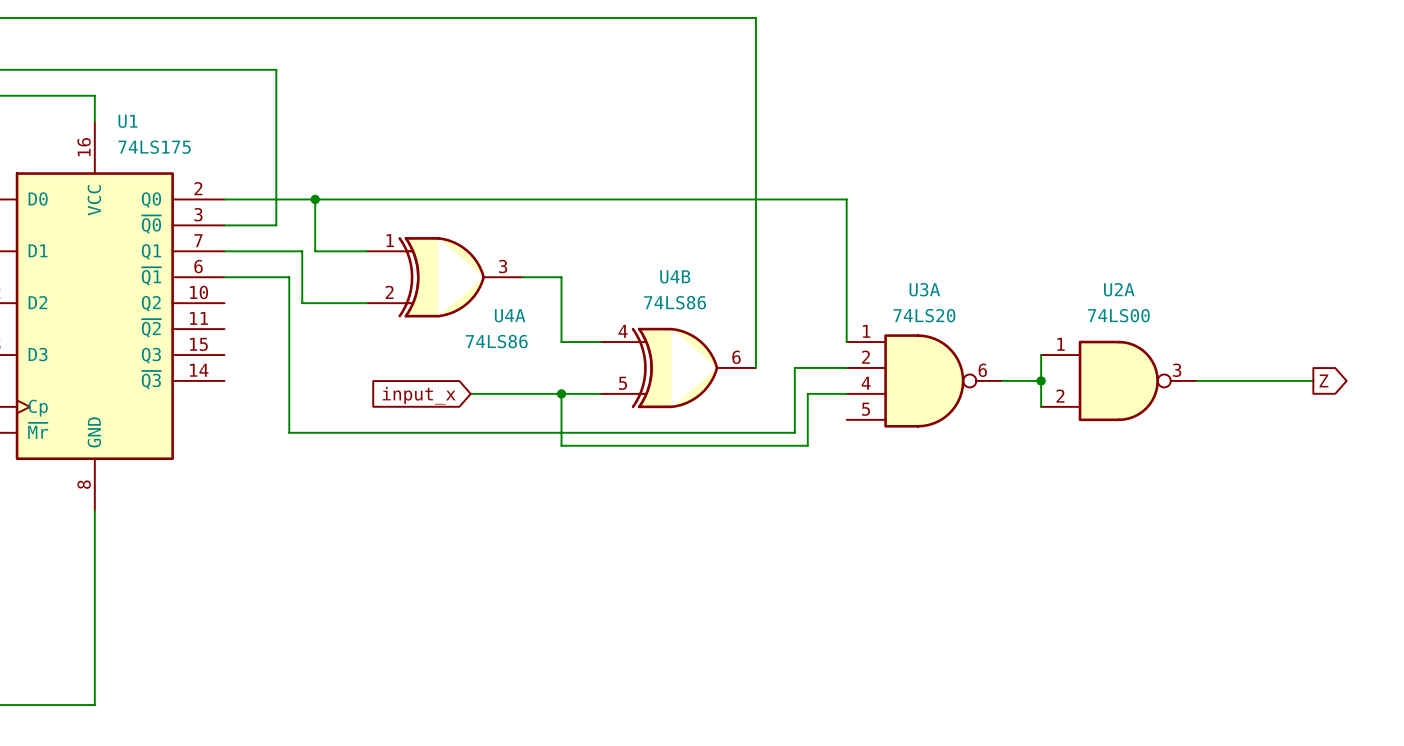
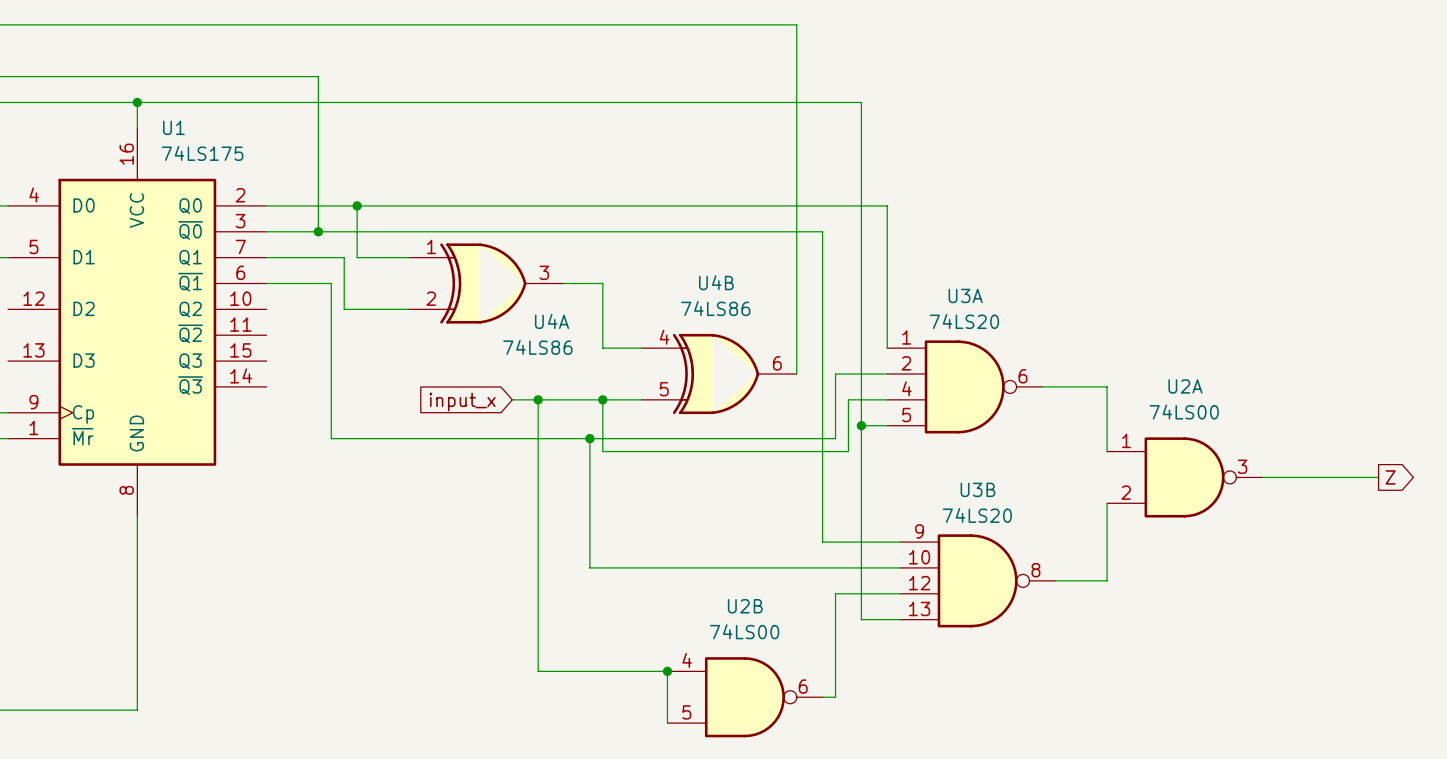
wire: none -> (137, 102) (861, 102) (861, 619) (900, 619)
junction: none -> (137, 102)
wire: none -> (318, 231) (822, 231) (822, 542) (900, 542)
junction: none -> (318, 231)
wire: (1041, 355) (1041, 406) -> none
wire: none -> (1081, 386) (1107, 386) (1107, 451)
junction: (1041, 380) -> none
U2A position: (1118, 380) -> (1184, 477)
wire: (1196, 380) (1313, 380) -> (1262, 477) (1378, 477)
global label position: Z (1323, 380) -> Z (1390, 477)
wire: none -> (538, 399) (538, 671) (667, 671) (667, 723)
junction: none -> (538, 399)
wire: none -> (861, 425) (887, 425)
junction: none -> (861, 425)
wire: none -> (589, 438) (589, 567) (900, 567)
junction: none -> (589, 438)
wire: none -> (1107, 503) (1107, 580) (1055, 580)
U3B: none -> 74LS20 (977, 580)
wire: none -> (900, 593) (835, 593) (835, 697) (822, 697)
junction: none -> (667, 671)
U2B: none -> 74LS00 (745, 697)

